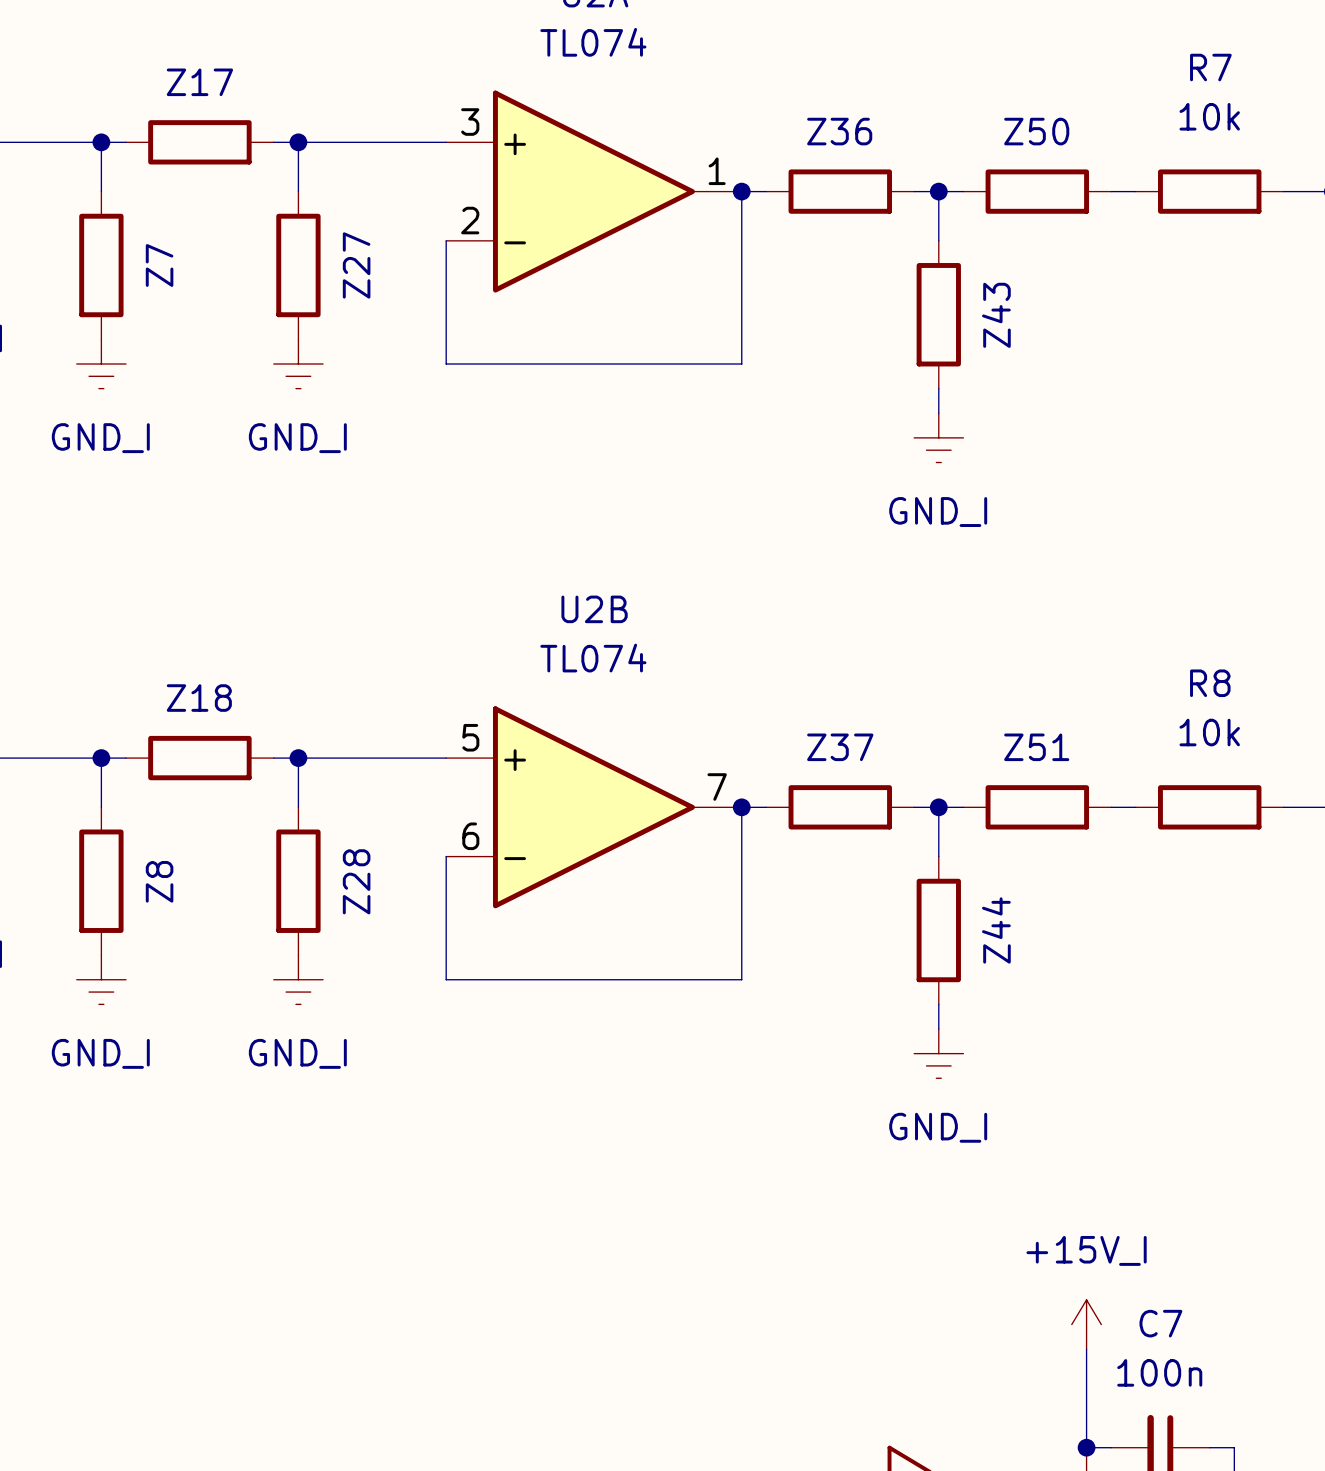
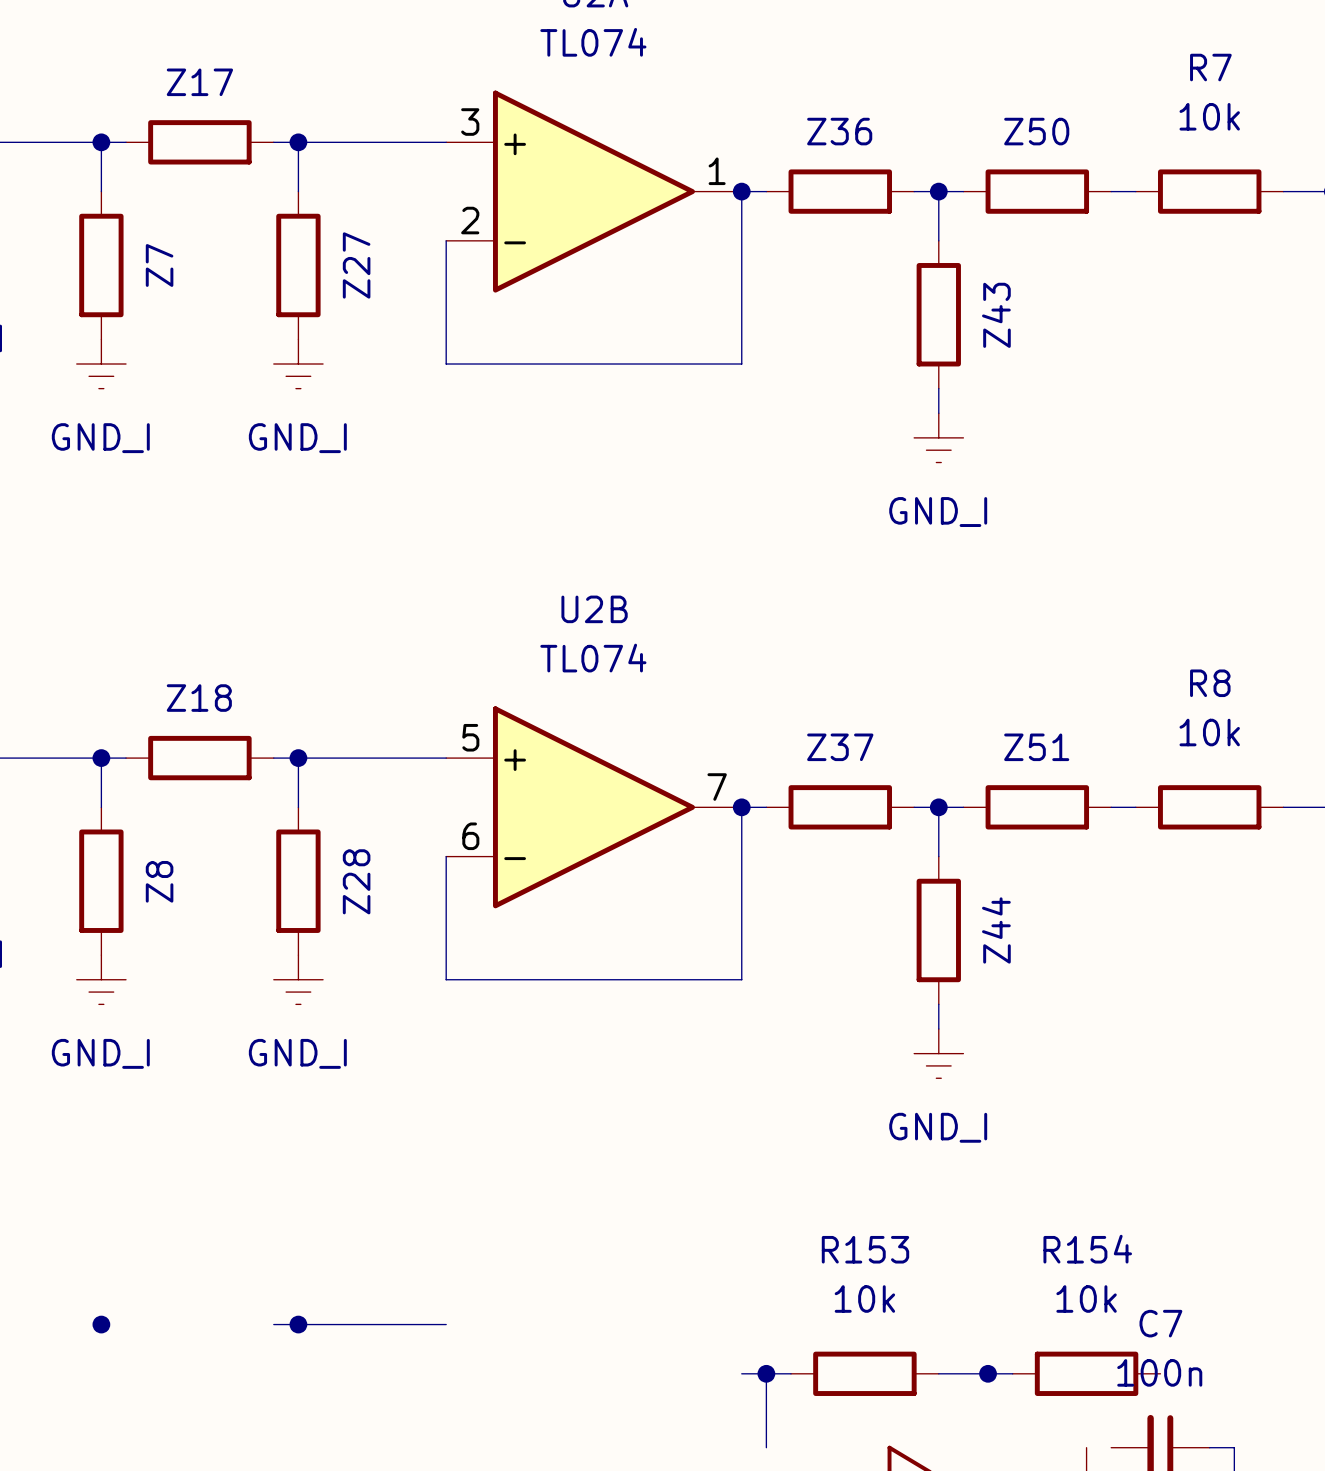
junction: none -> (101, 1324)
wire: none -> (273, 1324) (446, 1324)
junction: none -> (298, 1324)
power symbol: +15V_I (1086, 1324) -> none
wire: (1086, 1349) (1086, 1447) (1111, 1447) -> none
wire: none -> (741, 1373) (791, 1373)
wire: none -> (766, 1373) (766, 1447)
junction: none -> (766, 1373)
R153: none -> 10k (864, 1373)
wire: none -> (938, 1373) (1012, 1373)
junction: none -> (988, 1373)
R154: none -> 10k (1086, 1373)
junction: (1086, 1447) -> none

